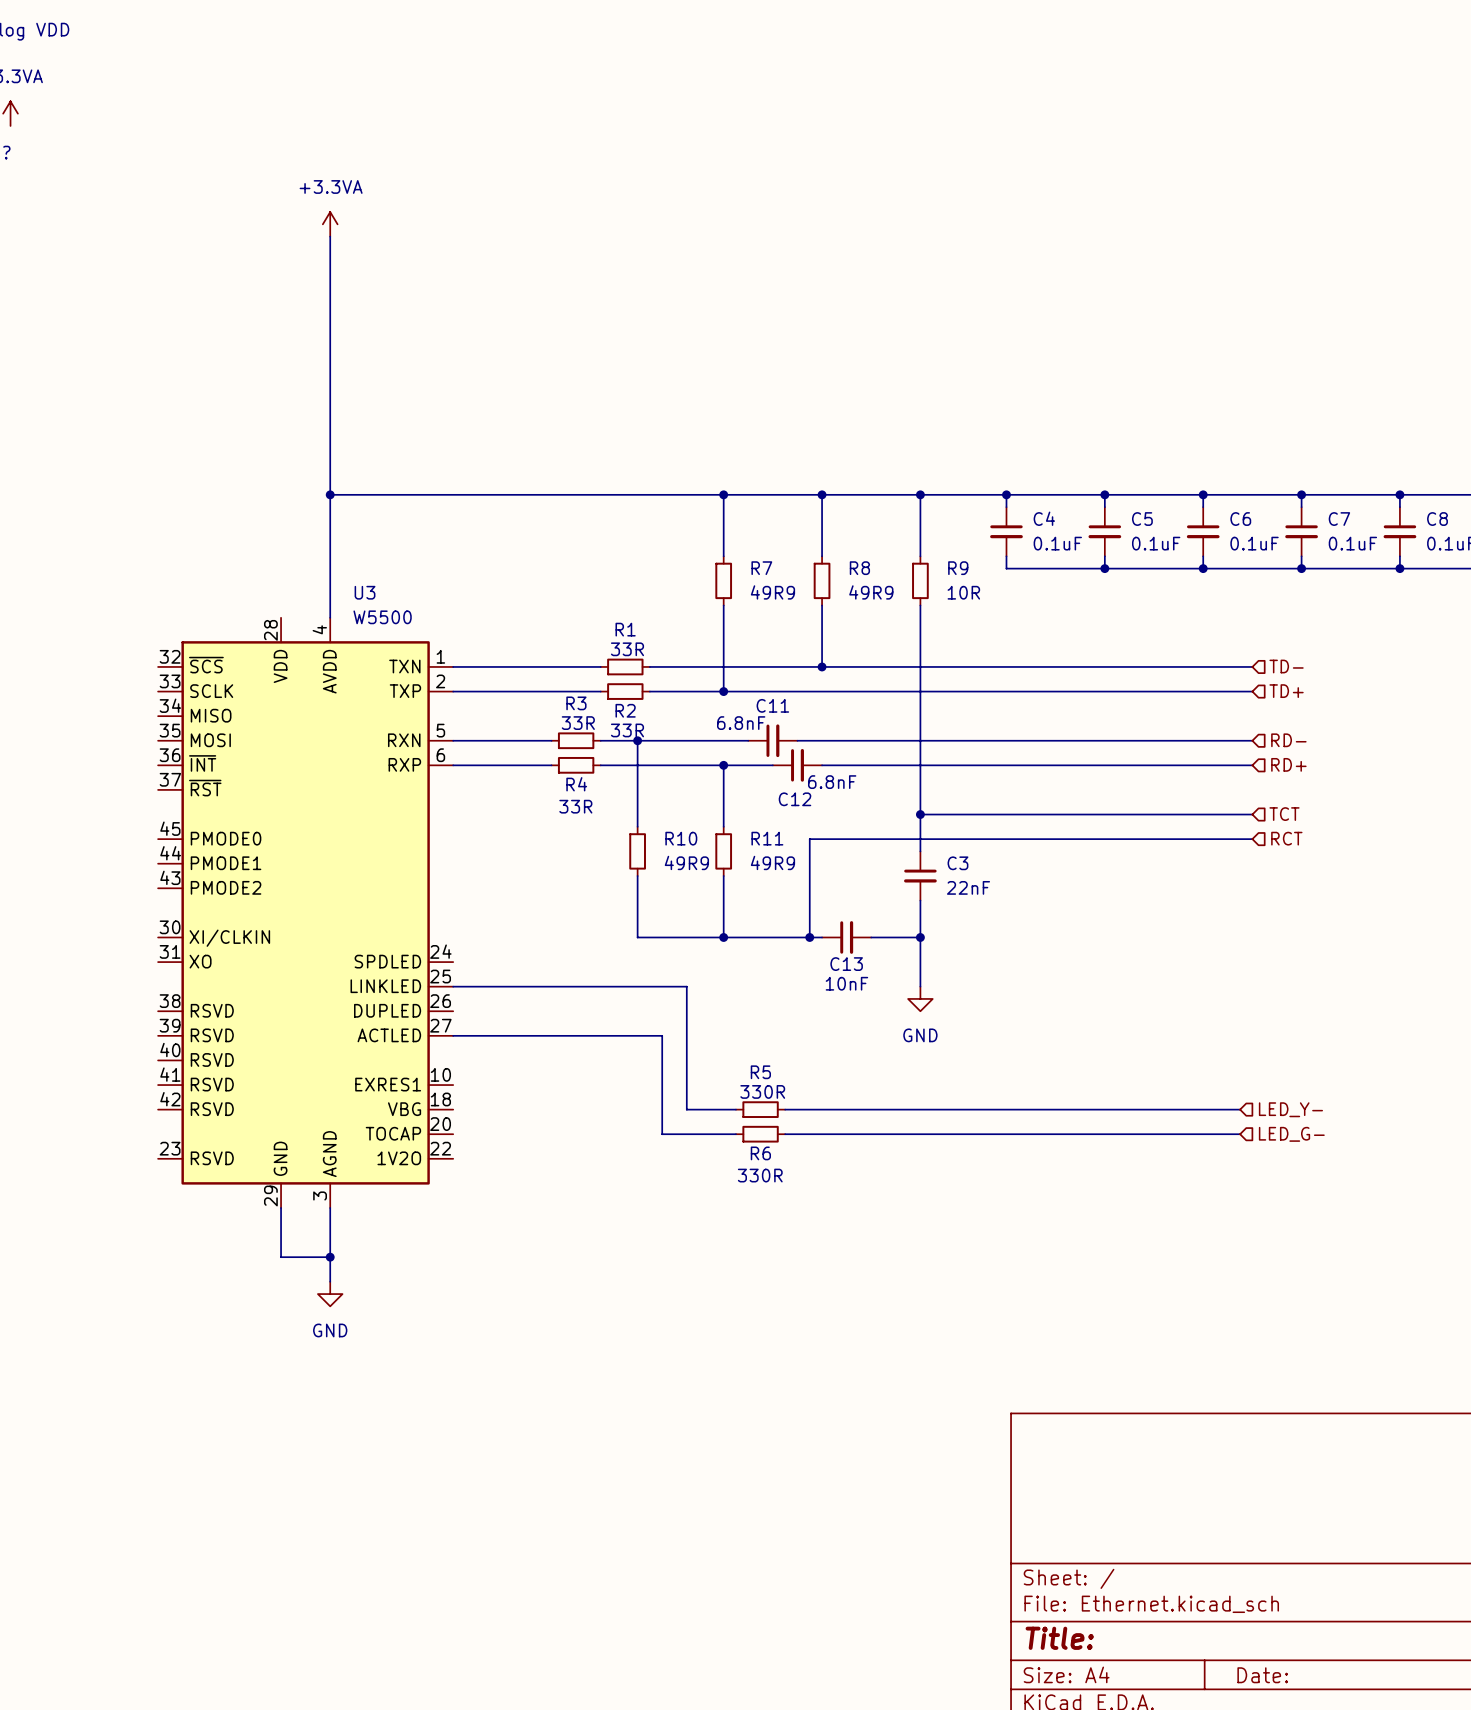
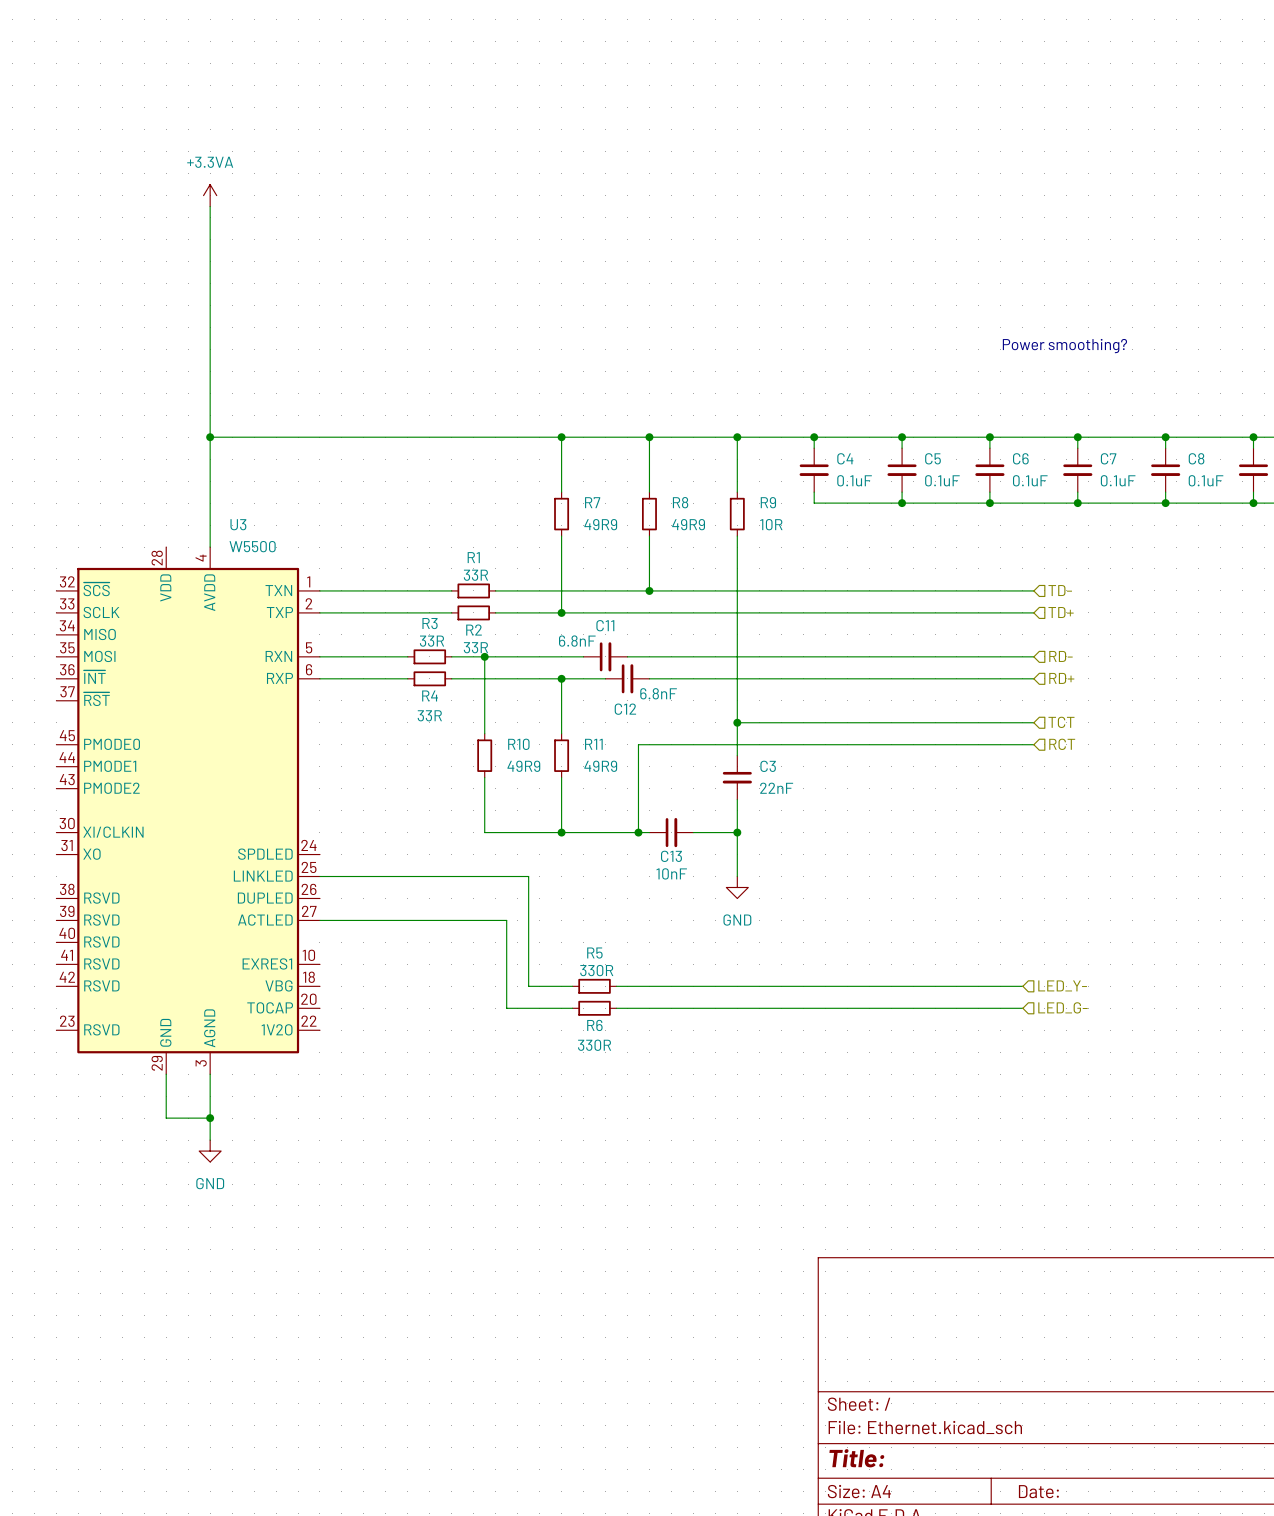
text: none -> Power smoothing? (1064, 346)

